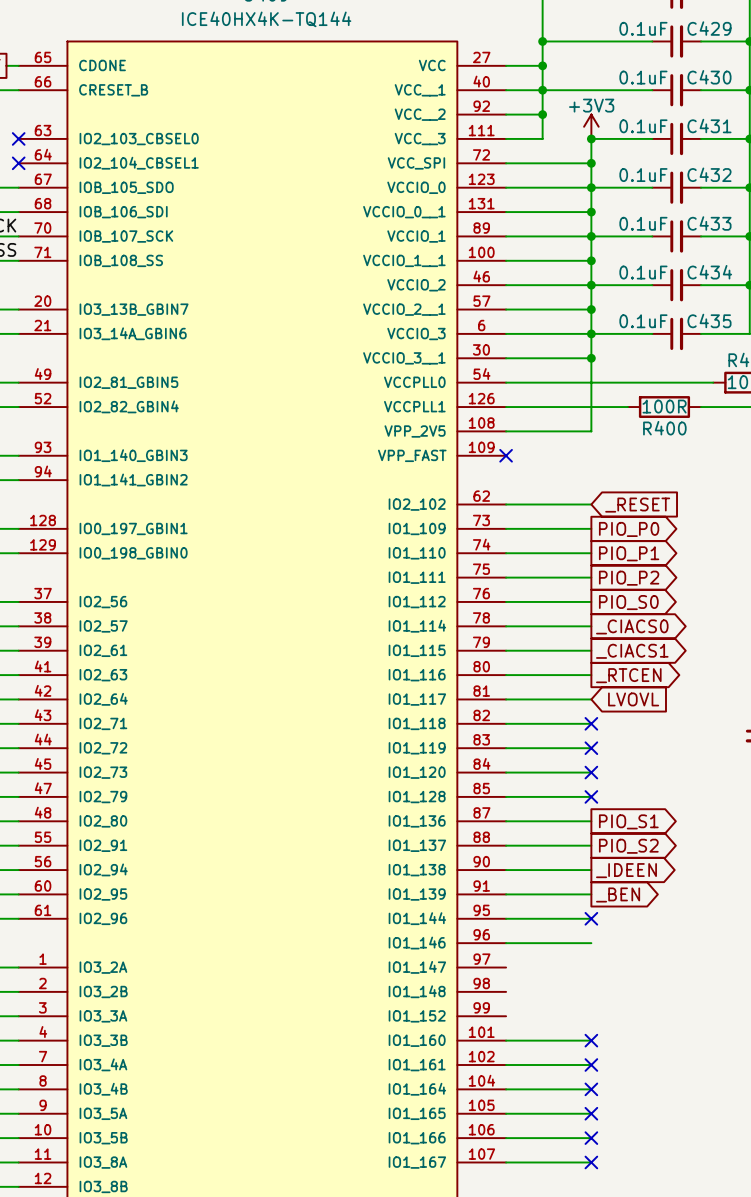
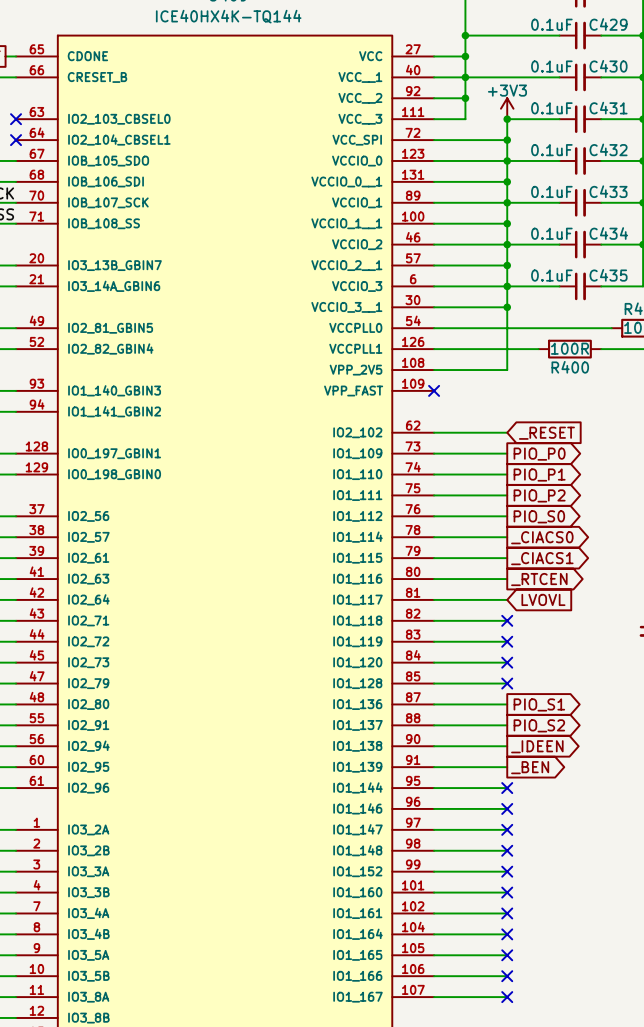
no-connect mark: none -> (507, 808)
wire: none -> (434, 829) (507, 829)
no-connect mark: none -> (507, 829)
wire: none -> (434, 850) (507, 850)
no-connect mark: none -> (507, 850)
wire: none -> (434, 871) (507, 871)
no-connect mark: none -> (507, 871)

